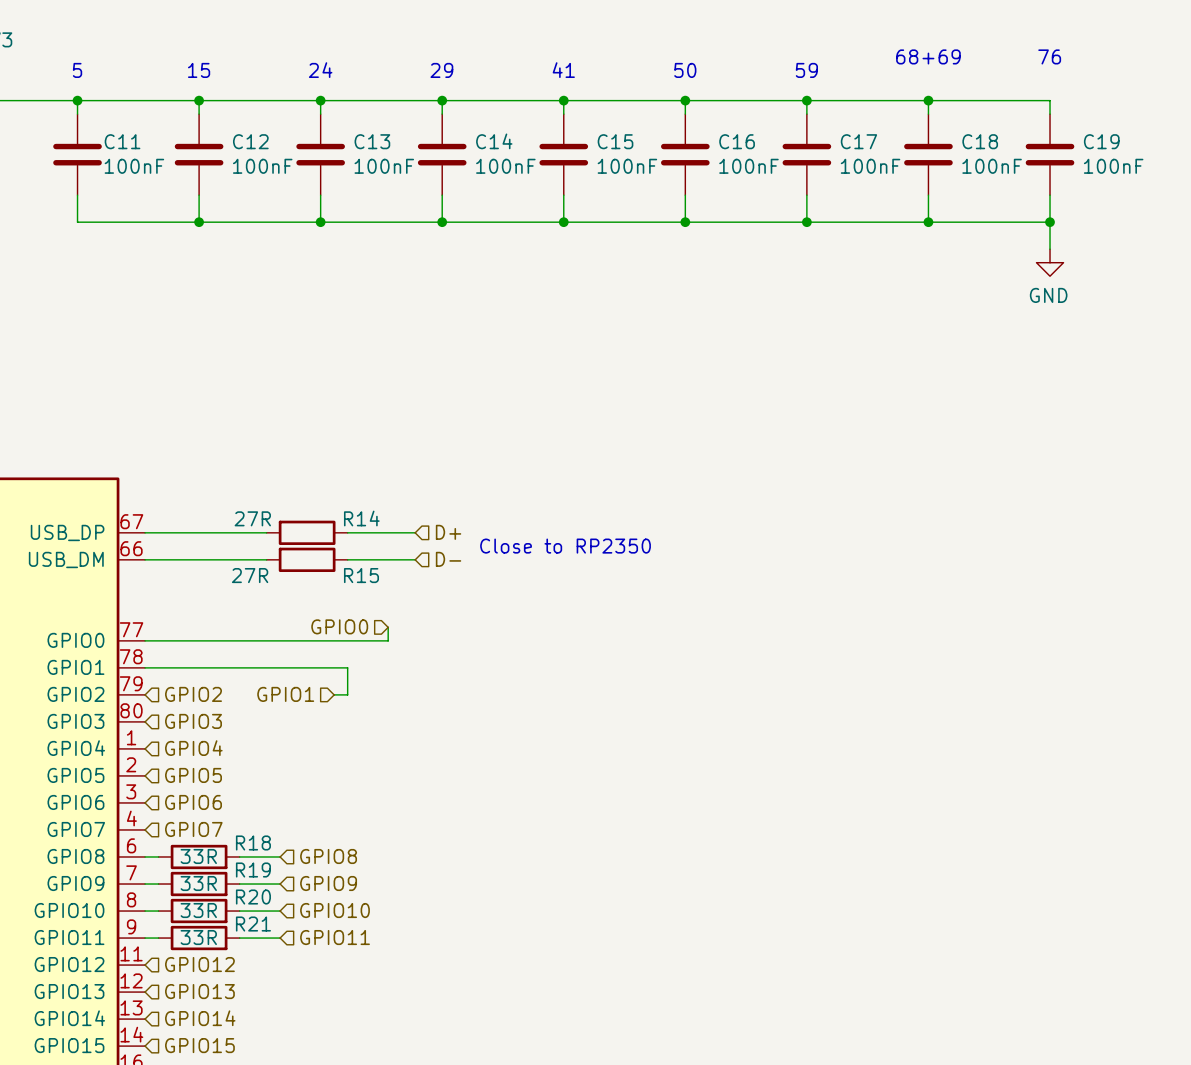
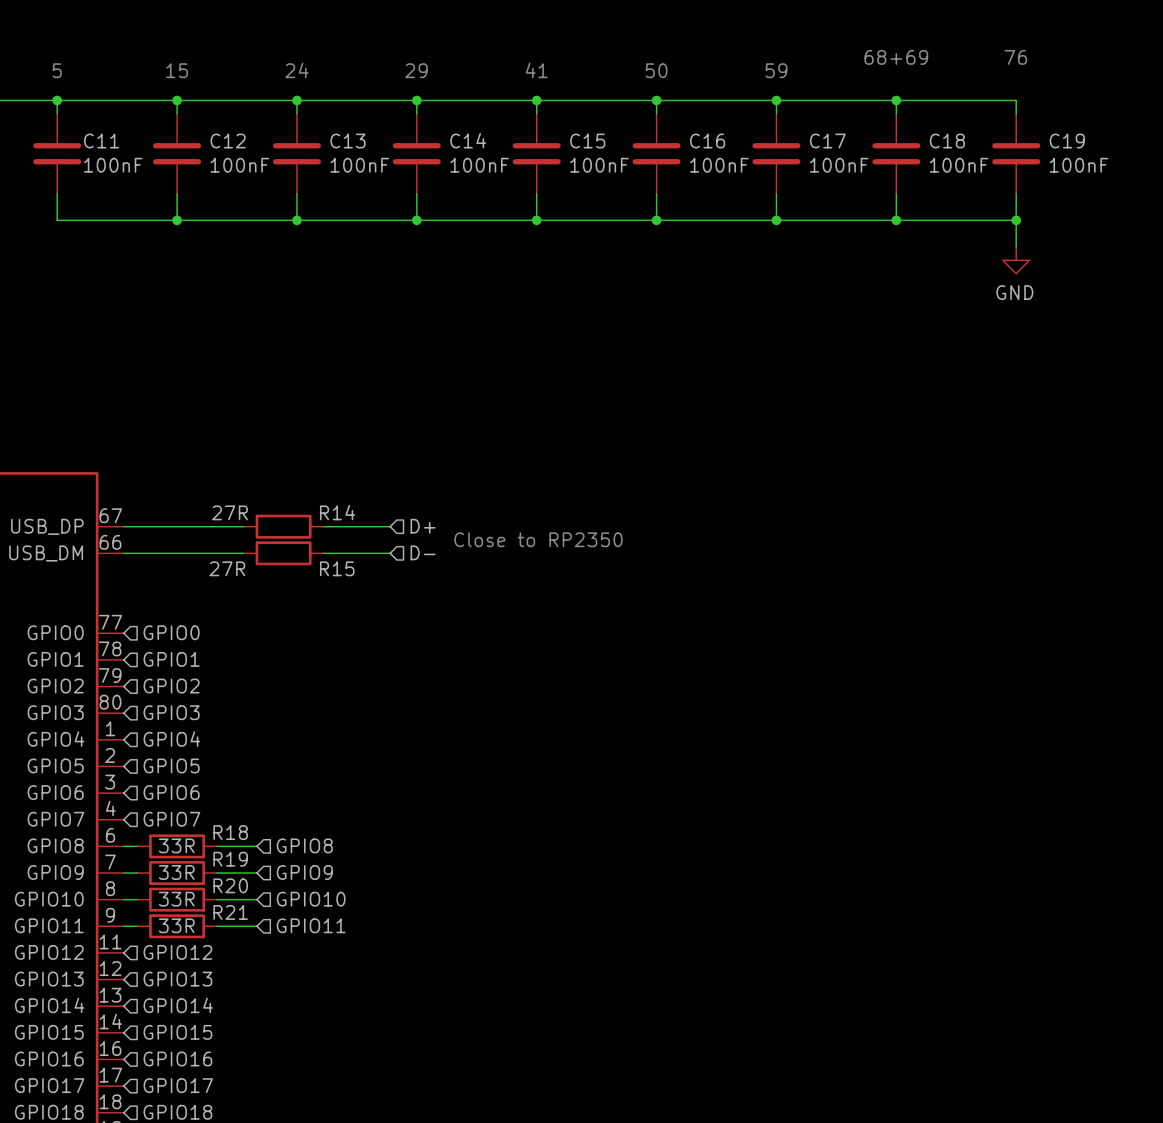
hierarchical label rotation: 0° (339, 626) -> 180° (171, 632)
hierarchical label position: GPIO0 (339, 626) -> GPIO0 (171, 632)
wire: (388, 627) (388, 640) (145, 640) -> none
wire: (145, 667) (347, 667) (347, 694) (334, 694) -> none
hierarchical label rotation: 0° (285, 694) -> 180° (171, 659)
hierarchical label position: GPIO1 (285, 694) -> GPIO1 (171, 659)

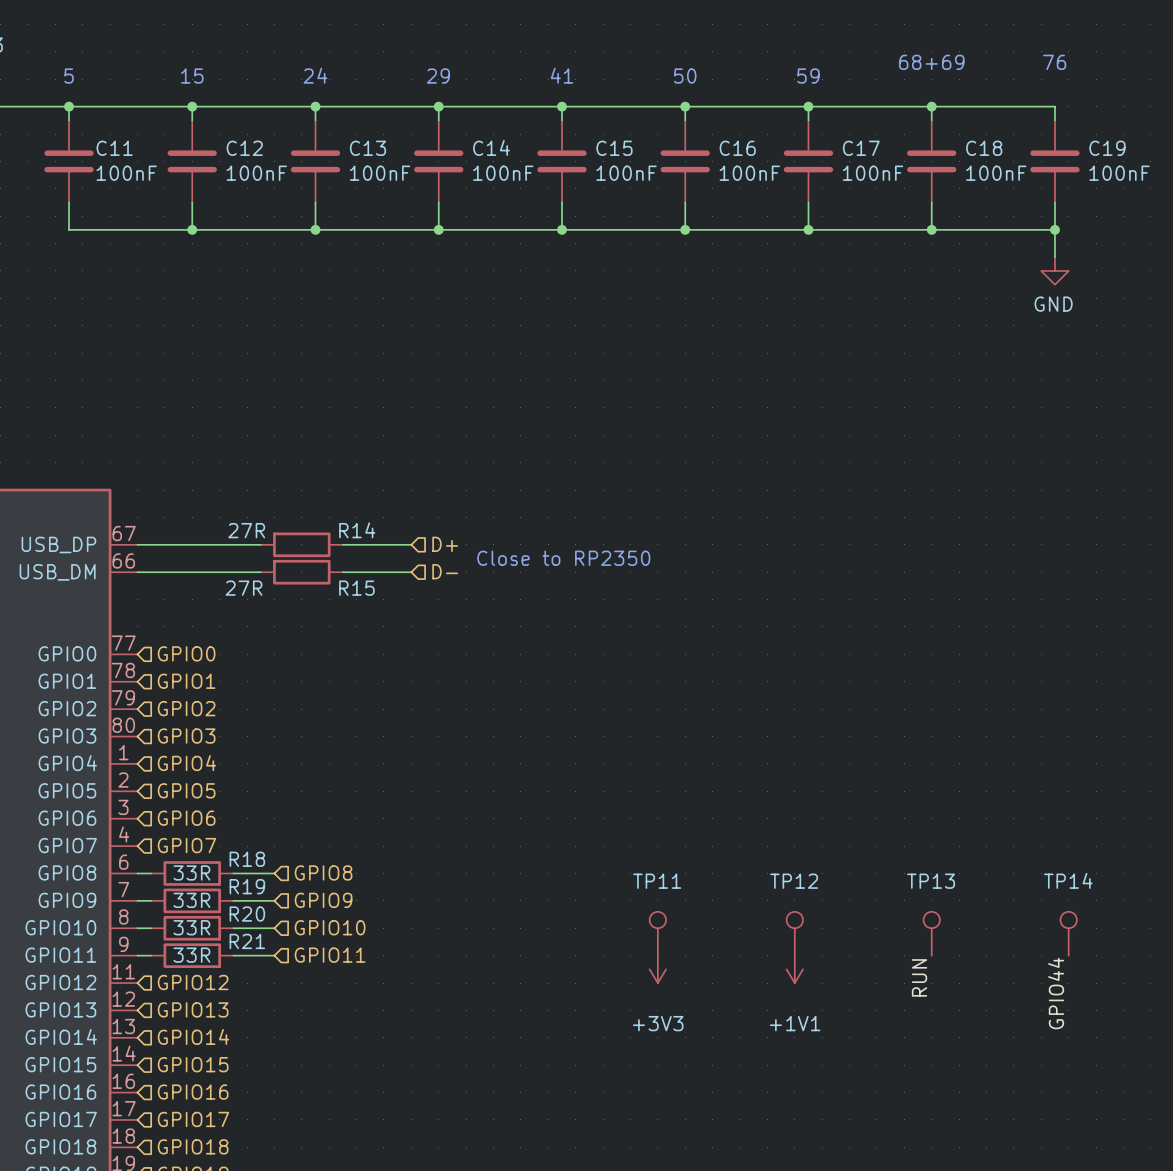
TP11: none -> (657, 933)
TP12: none -> (794, 933)
TP13: none -> (931, 933)
TP14: none -> (1068, 933)
power symbol: none -> +3V3 (657, 969)
power symbol: none -> +1V1 (794, 969)
label: none -> RUN (919, 977)
label: none -> GPIO44 (1056, 993)

